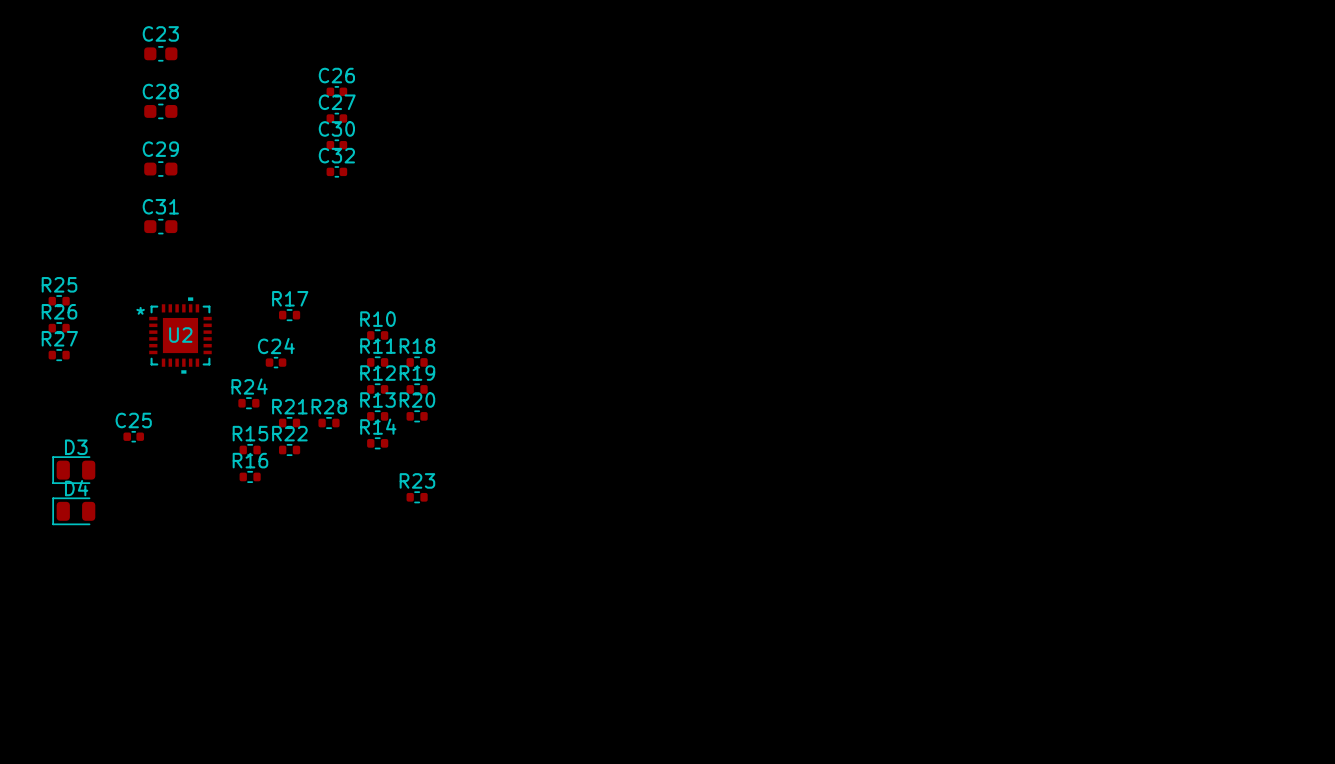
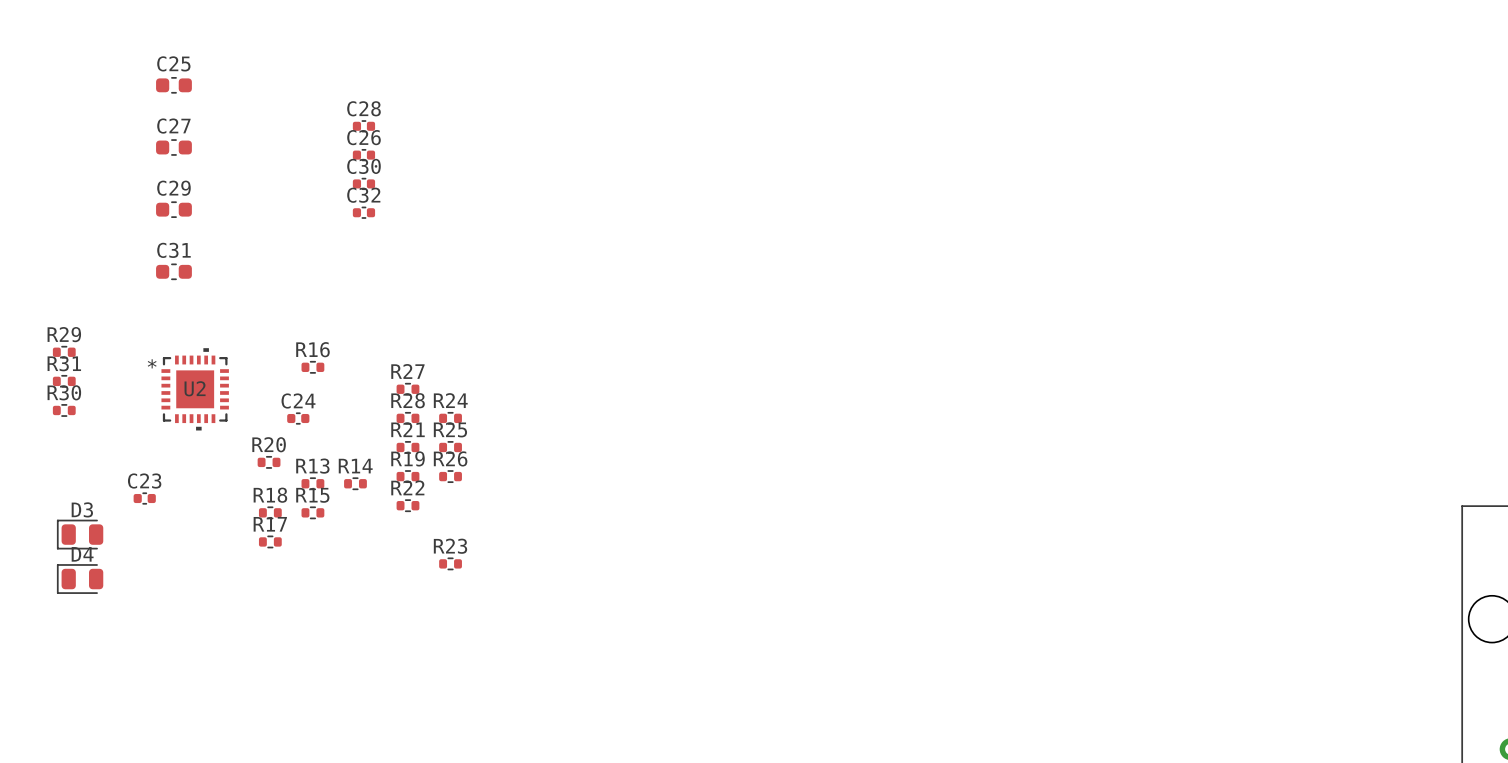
C23 name: C23 (160, 33) -> C25 (173, 63)
C26 name: C26 (336, 75) -> C28 (364, 108)
C28 name: C28 (160, 91) -> C27 (173, 126)
C27 name: C27 (337, 102) -> C26 (363, 137)
R25 name: R25 (59, 284) -> R29 (64, 334)
R17 name: R17 (290, 298) -> R16 (312, 349)
R26 name: R26 (59, 311) -> R31 (64, 363)
R10 name: R10 (378, 319) -> R27 (407, 371)
R27 name: R27 (59, 338) -> R30 (64, 392)
R11 name: R11 (378, 346) -> R28 (408, 400)
R18 name: R18 (417, 346) -> R24 (450, 400)
R12 name: R12 (378, 373) -> R21 (408, 429)
R19 name: R19 (417, 373) -> R25 (450, 429)
R24 name: R24 (249, 386) -> R20 (269, 444)
R13 name: R13 (378, 400) -> R19 (408, 458)
R20 name: R20 (417, 400) -> R26 (450, 458)
R21 name: R21 (289, 406) -> R13 (312, 466)
R28 name: R28 (329, 406) -> R14 (355, 466)
C25 name: C25 (133, 420) -> C23 (144, 481)
R14 name: R14 (378, 426) -> R22 (407, 487)
R15 name: R15 (250, 433) -> R18 (270, 495)
R22 name: R22 (289, 433) -> R15 (312, 495)
R16 name: R16 (250, 460) -> R17 (270, 524)

